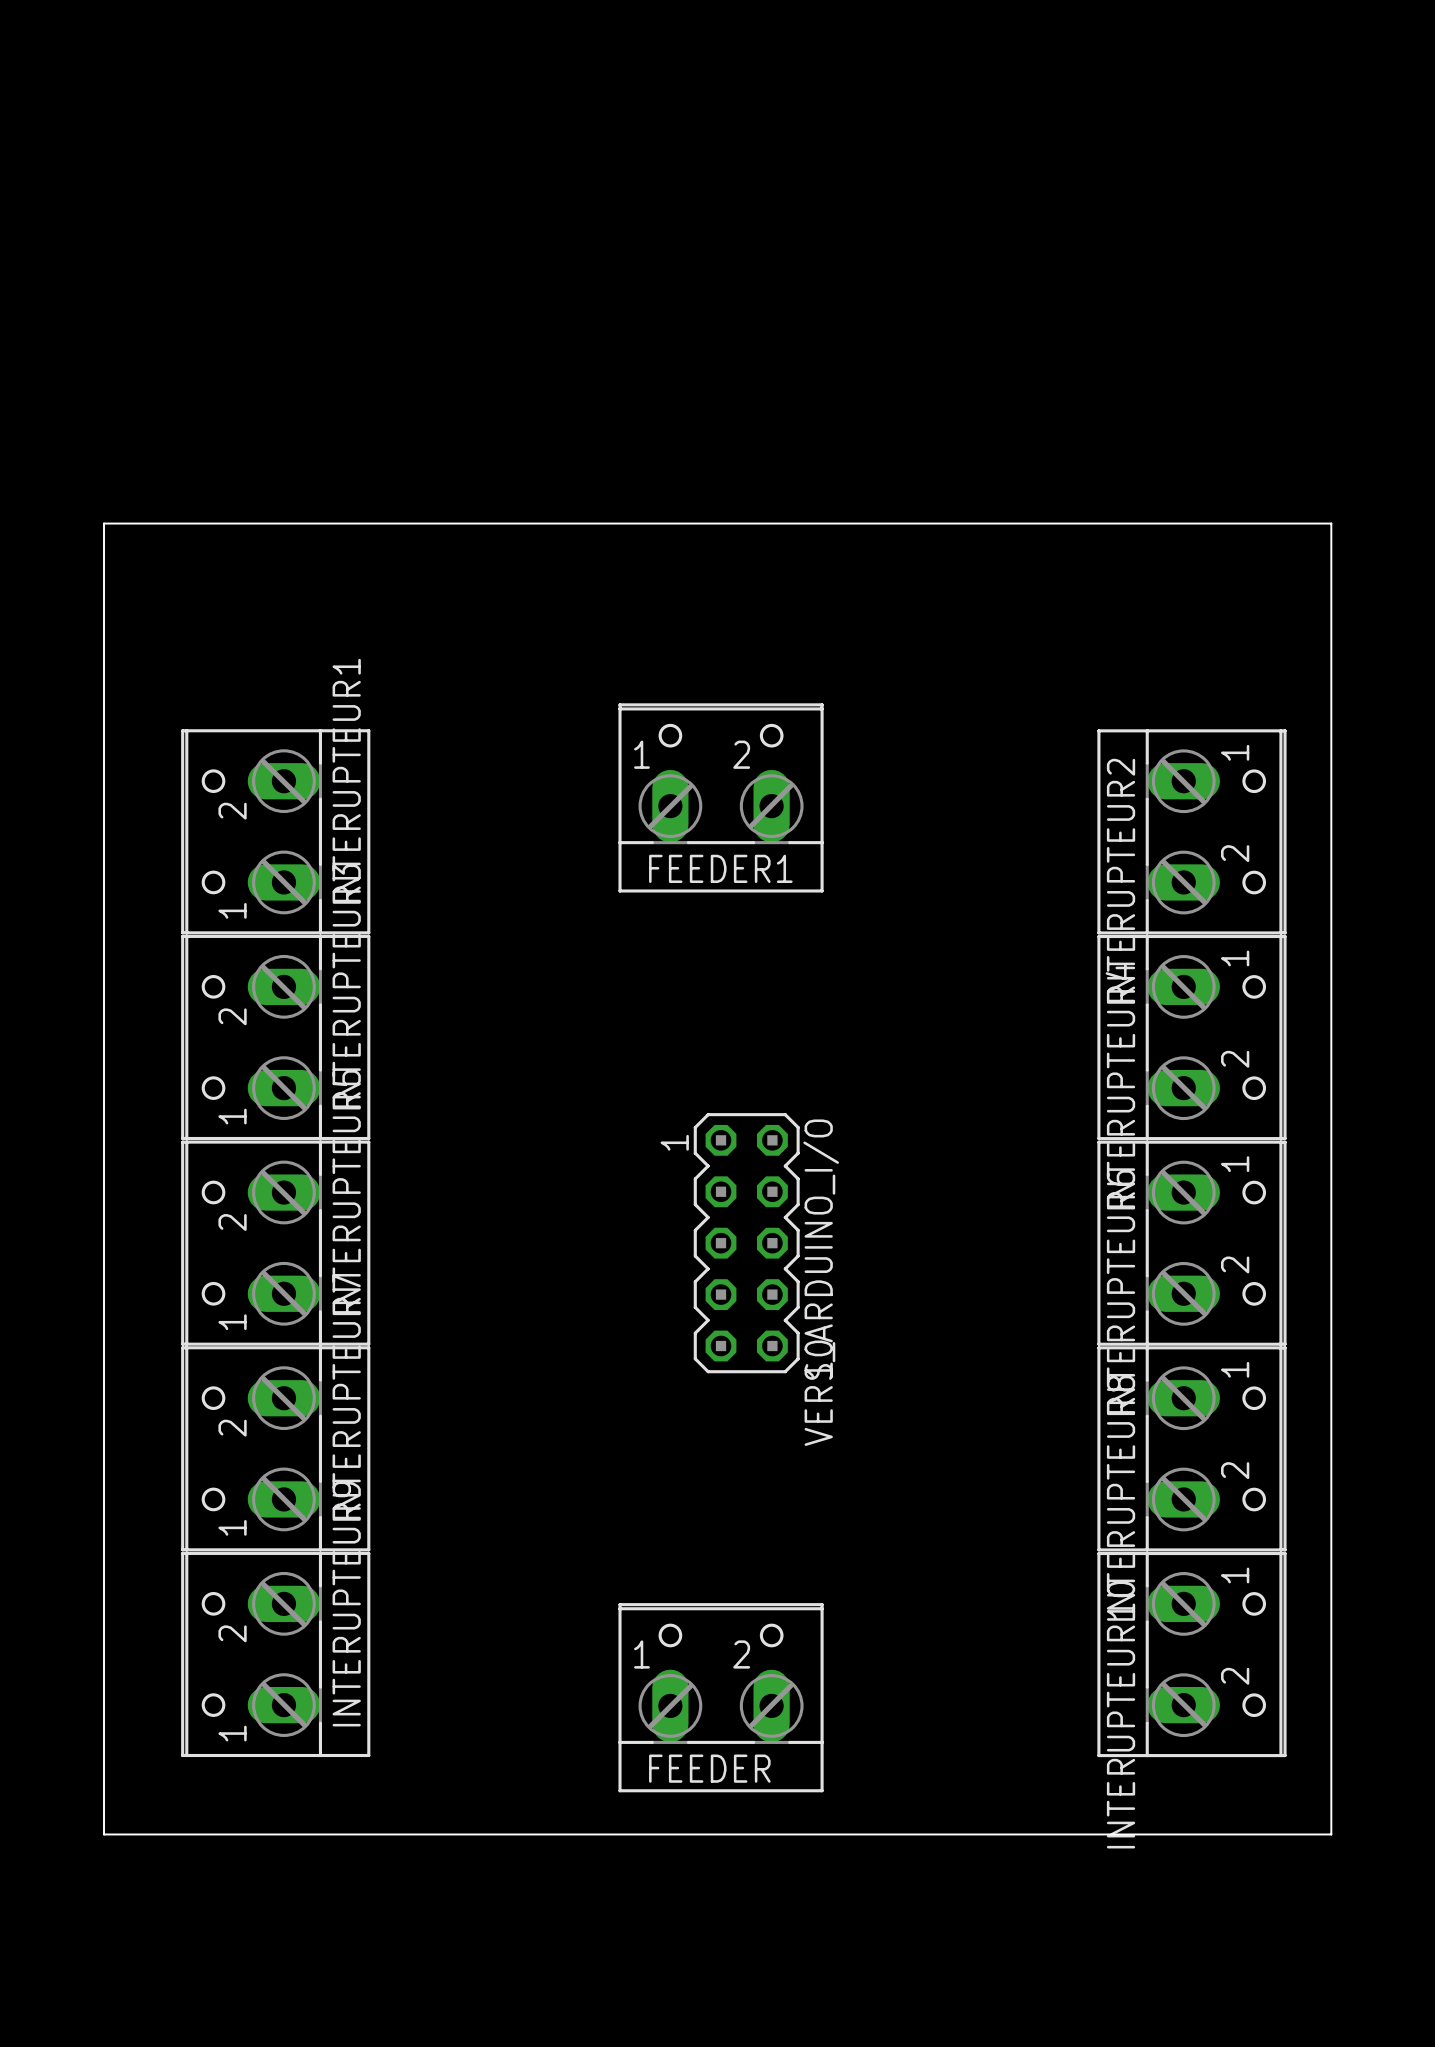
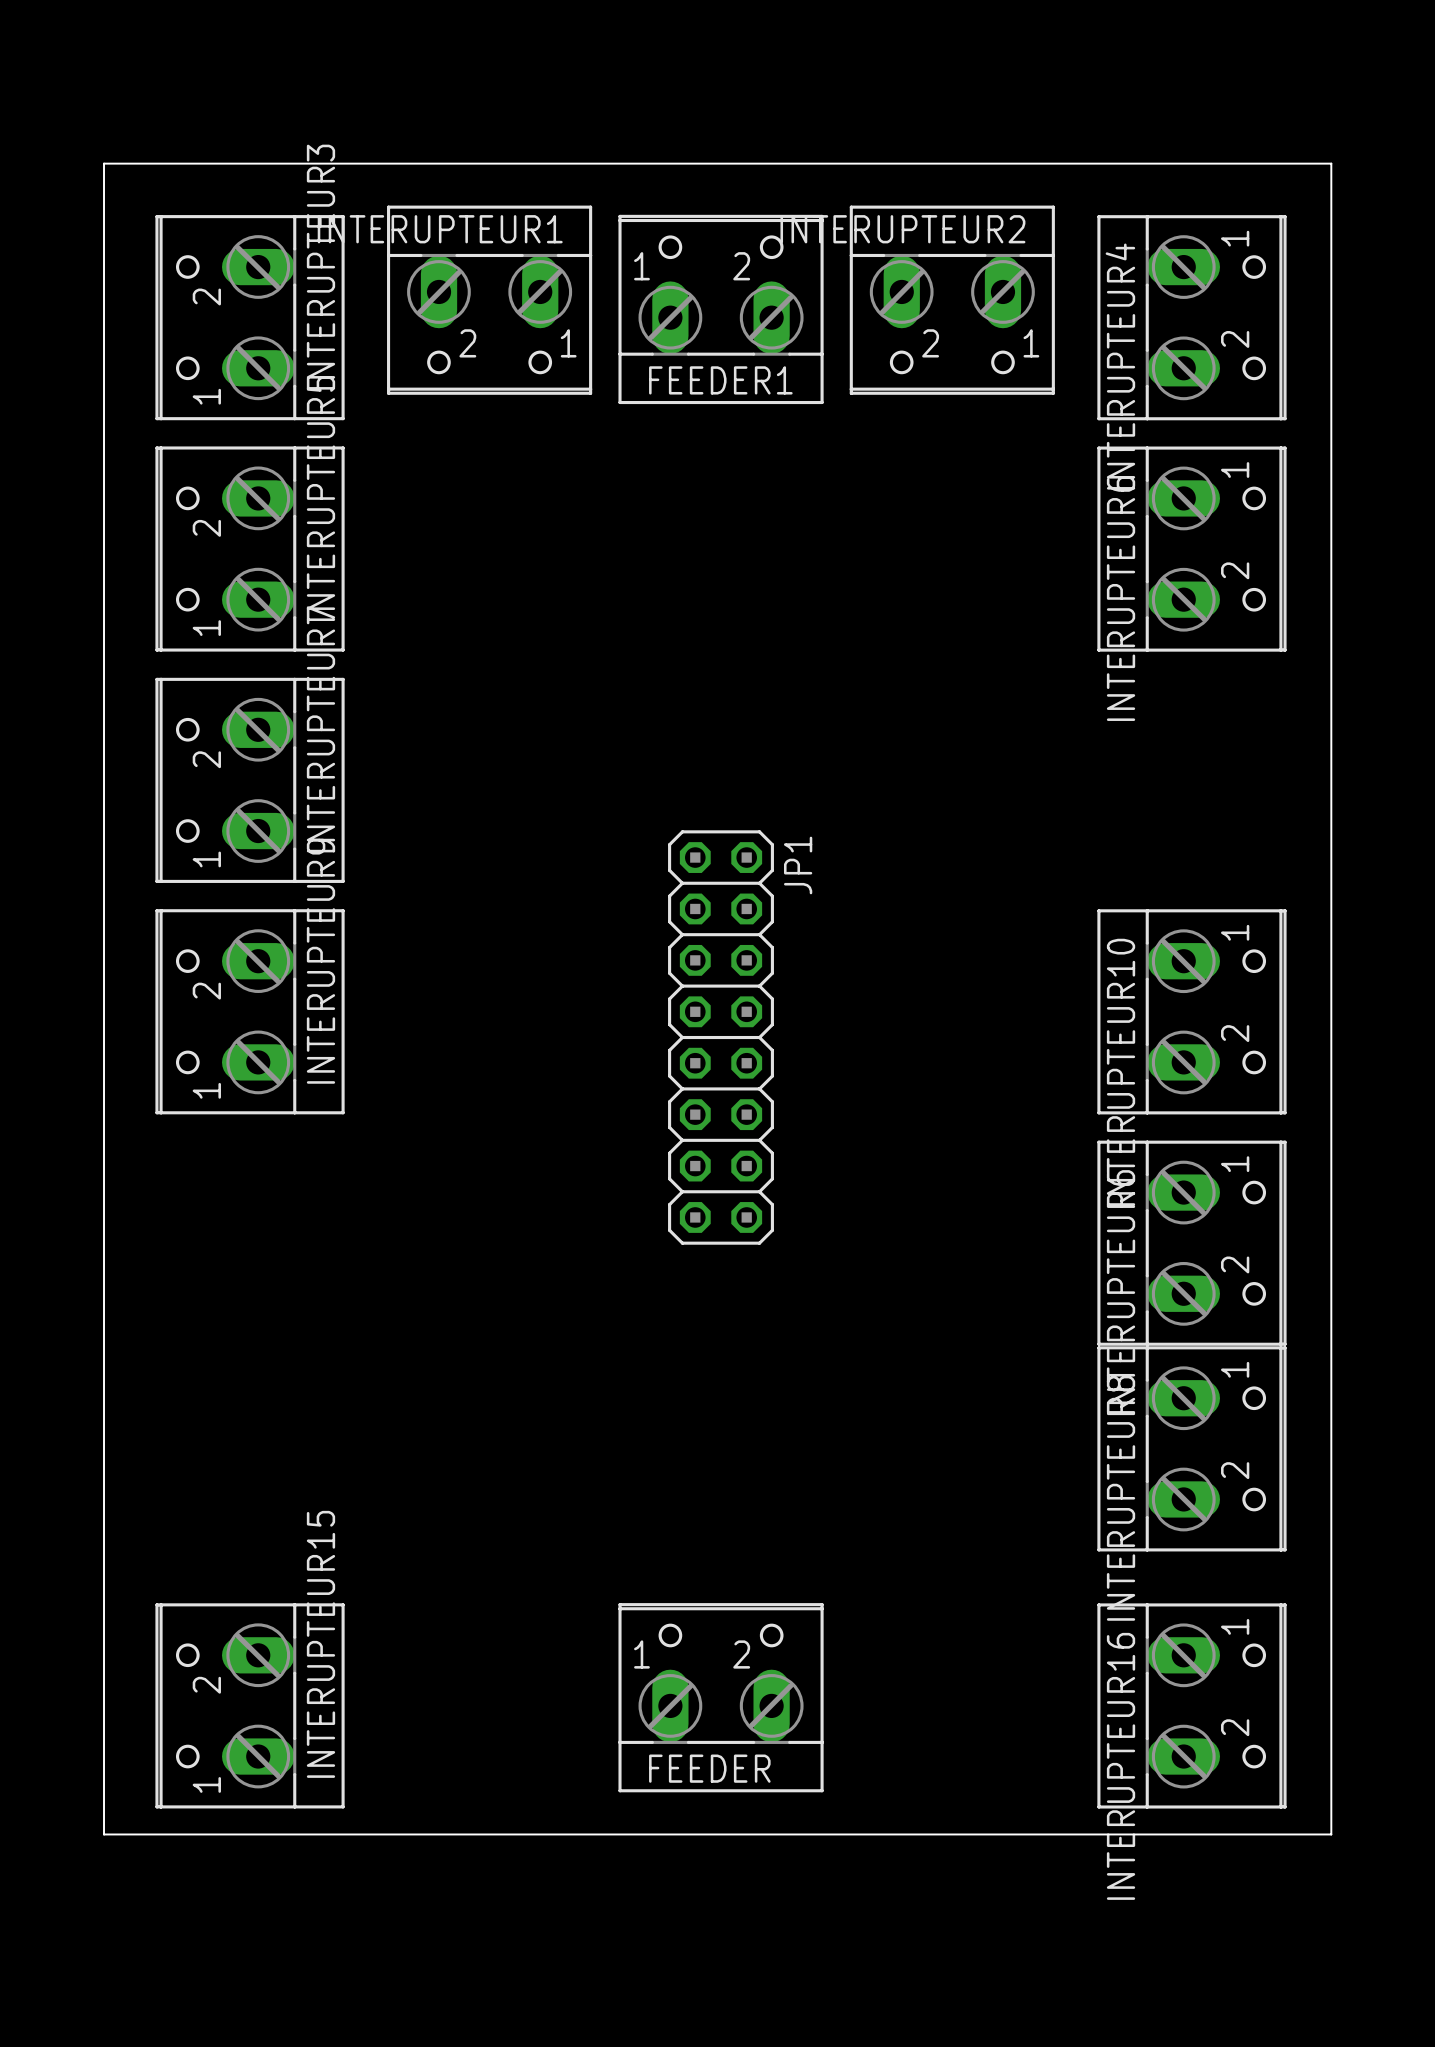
board edge: (104, 523) (1331, 523) -> (104, 523) (104, 163) (1331, 163) (1331, 523)
INTERUPTEUR6: none -> (1191, 549)
INTERUPTEUR1 footprint: [181, 729, 371, 935] -> [387, 205, 593, 395]
INTERUPTEUR1 name position: INTERUPTEUR1 (346, 781) -> INTERUPTEUR1 (440, 229)
FEEDER1 position: (721, 797) -> (721, 309)
INTERUPTEUR2 rotation: 0° (1191, 831) -> 90° clockwise (952, 300)
INTERUPTEUR2 position: (1191, 831) -> (952, 300)
INTERUPTEUR3 position: (275, 1037) -> (250, 317)
JP1: none -> (721, 1037)
INTERUPTEUR4 position: (1191, 1037) -> (1191, 317)
INTERUPTEUR5 position: (275, 1243) -> (250, 549)
VERS_ARDUINO_I/O: (746, 1243) -> none
INTERUPTEUR7 position: (275, 1448) -> (250, 780)
INTERUPTEUR9 position: (275, 1654) -> (250, 1011)
INTERUPTEUR10 position: (1191, 1654) -> (1191, 1011)
INTERUPTEUR15: none -> (250, 1705)
INTERUPTEUR16: none -> (1191, 1705)

